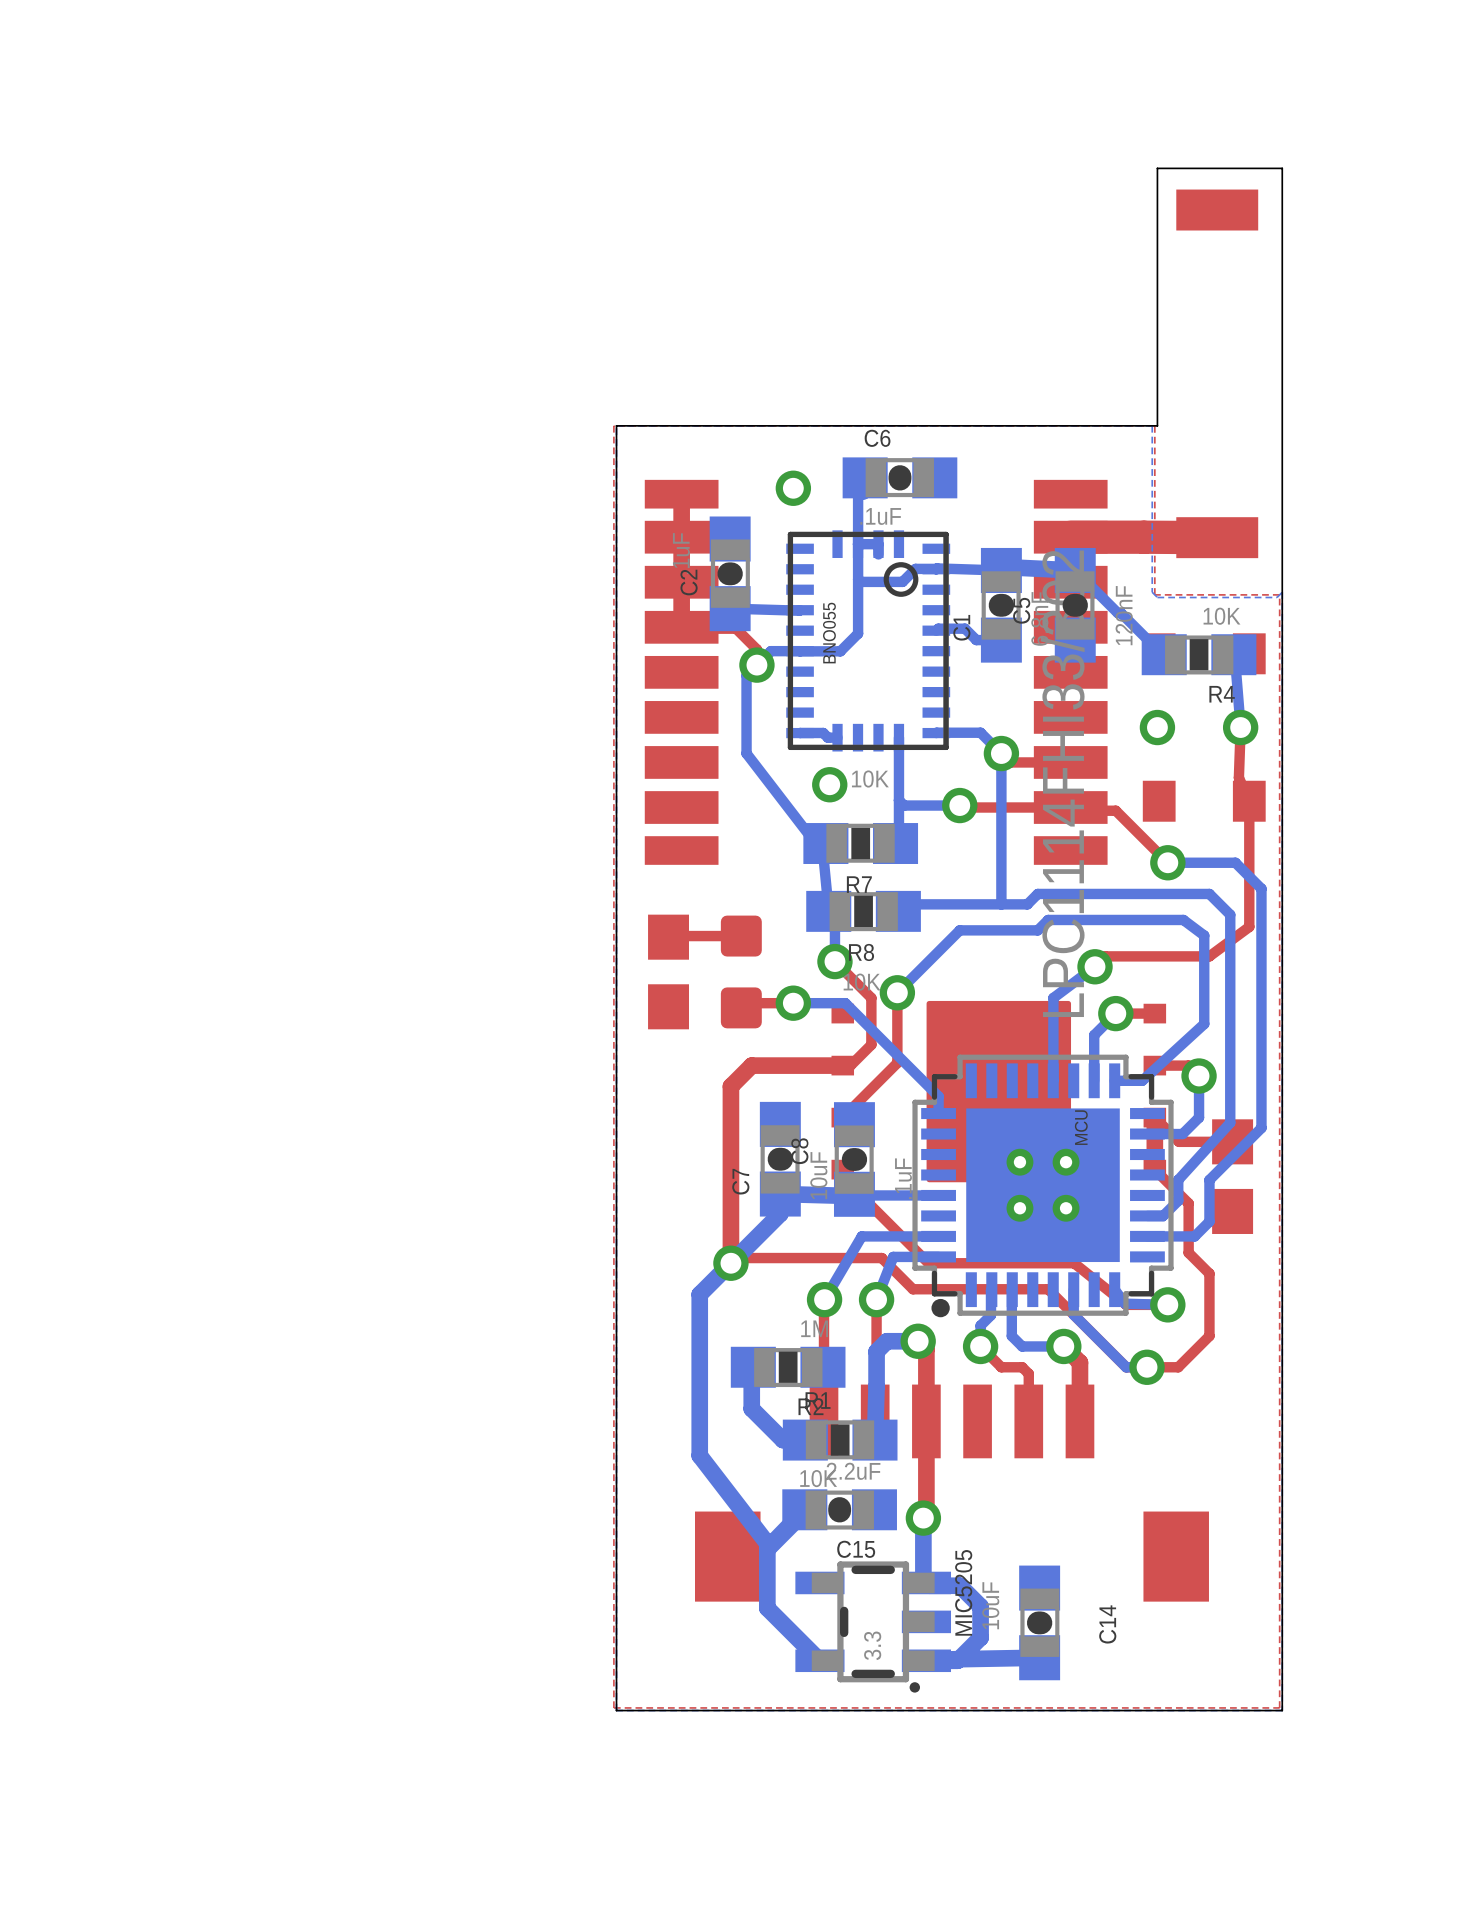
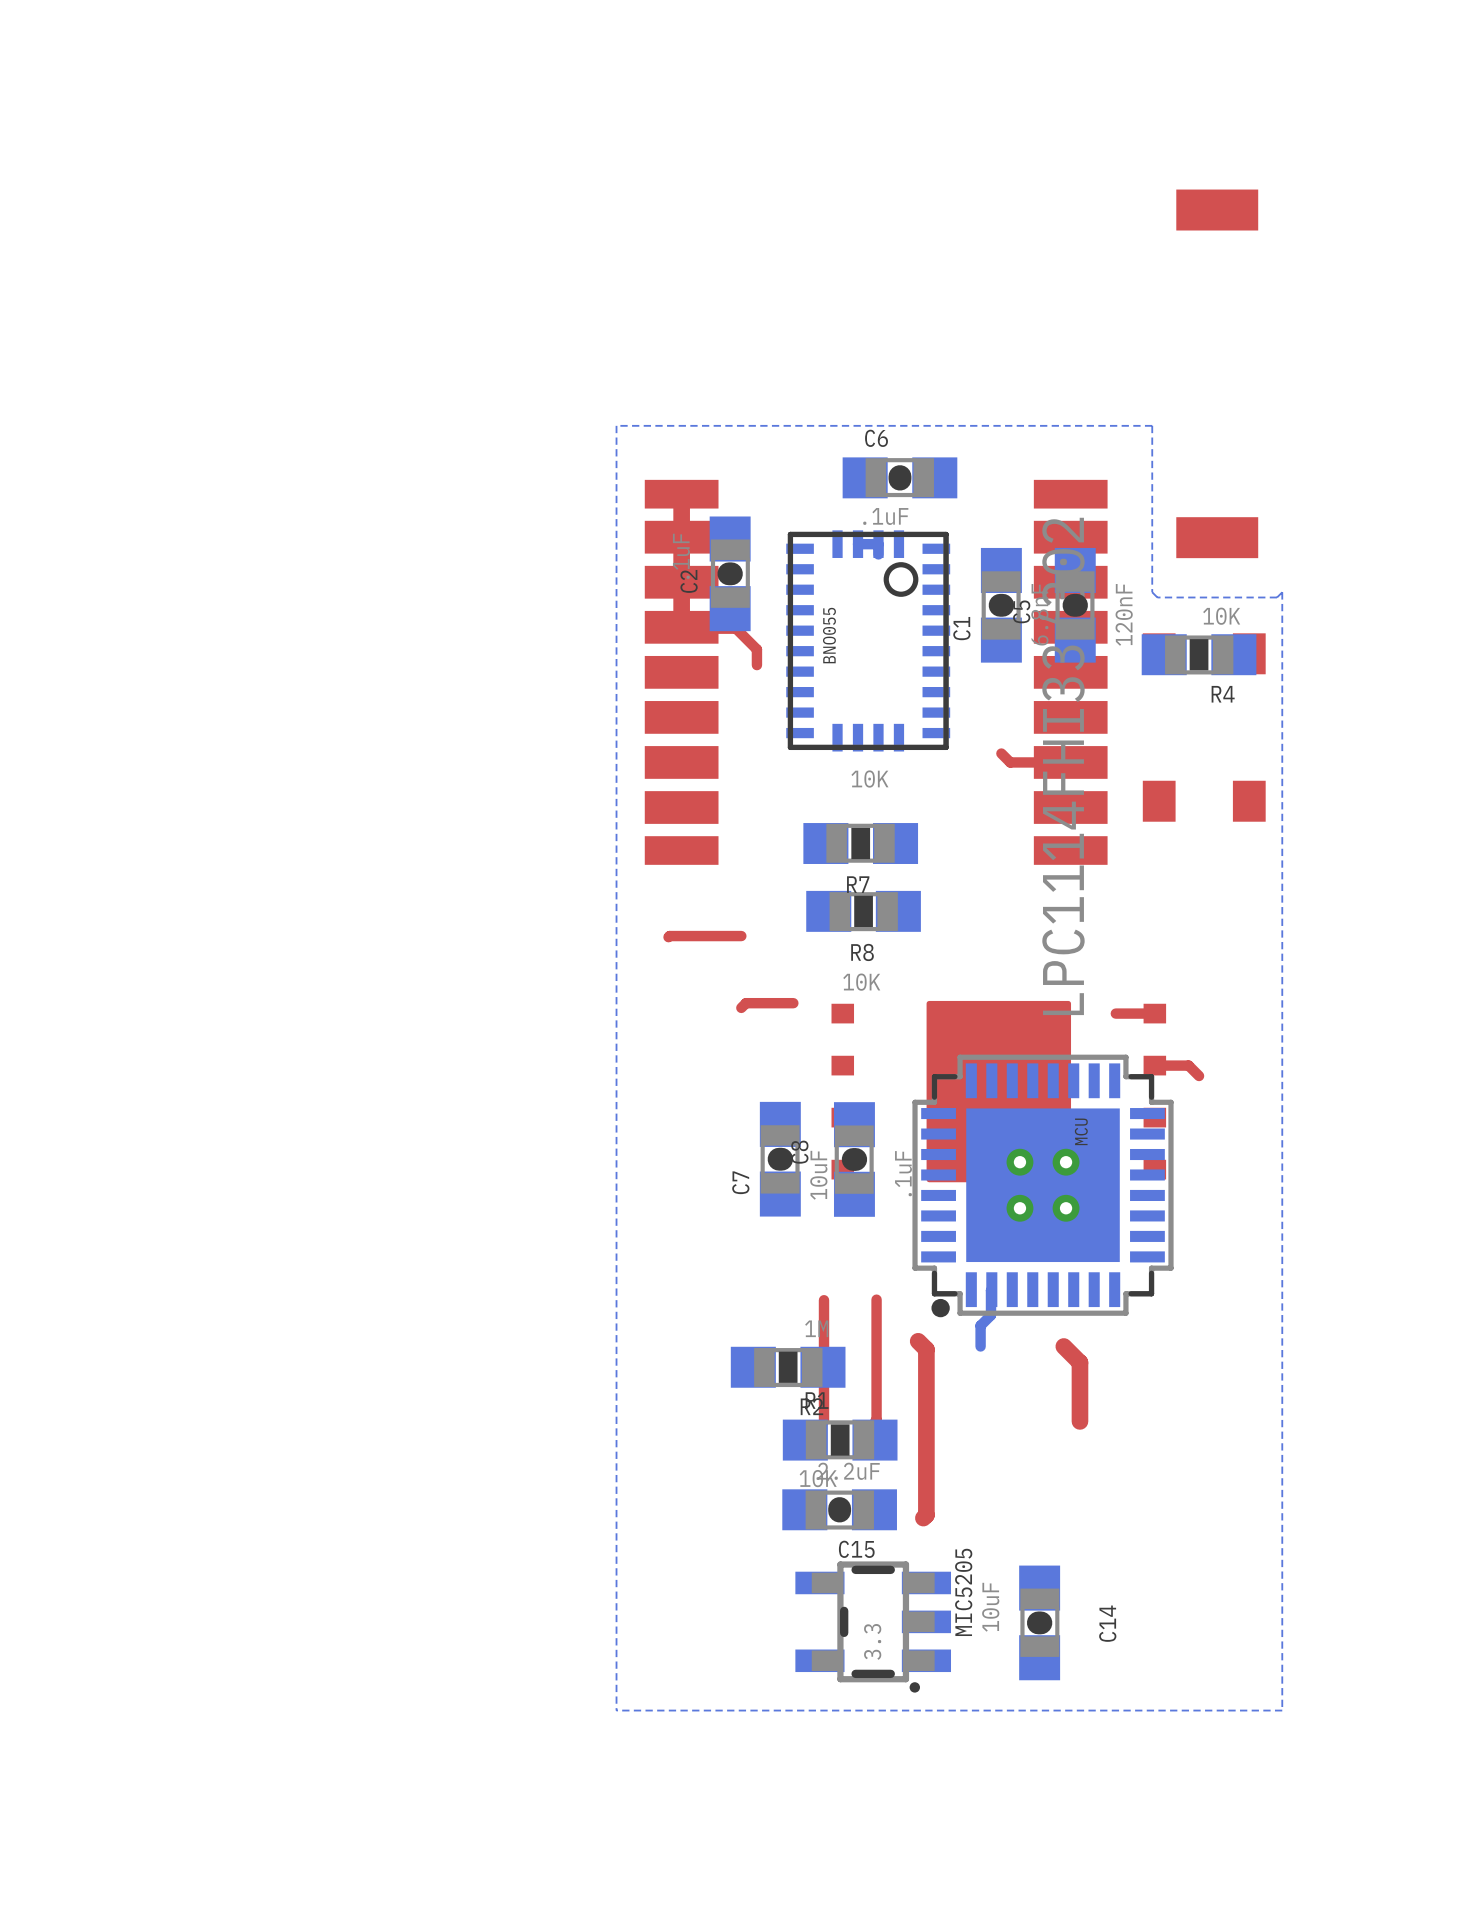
board edge: (1282, 168) (1282, 1710) (616, 1710) (616, 425) (1157, 425) (1157, 168) (1282, 168) -> none
top zone outline: (1154, 425) (1154, 594) (1279, 594) (1279, 1707) (613, 1707) (613, 425) (1154, 425) -> none
bottom track: (865, 477) (864, 494) (858, 494) (858, 633) (840, 651) (800, 651) -> none
via: (793, 488) -> none
top track: (1070, 537) (1217, 537) -> none
bottom track: (935, 568) (915, 568) (902, 581) (860, 581) (858, 579) -> none
bottom track: (936, 569) (1001, 570) (1010, 567) (1075, 570) (1117, 613) (1121, 613) (1164, 654) -> none
bottom track: (730, 608) (799, 610) -> none
bottom track: (936, 630) (938, 628) (964, 628) (976, 640) (1001, 640) -> none
bottom track: (800, 651) (770, 651) (746, 675) (746, 753) (815, 843) (825, 843) (822, 845) (828, 911) (834, 917) (834, 961) -> none
bottom track: (1233, 654) (1240, 727) -> none
via: (756, 665) -> none
via: (1157, 727) -> none
top track: (1240, 727) (1238, 777) (1249, 801) (1249, 926) (1209, 956) (1105, 956) (1095, 966) -> none
via: (1240, 727) -> none
bottom track: (800, 732) (823, 732) (827, 737) (837, 737) -> none
bottom track: (936, 732) (980, 732) (1001, 753) (1001, 904) -> none
bottom track: (898, 737) (898, 831) (895, 843) (897, 841) -> none
via: (1001, 753) -> none
via: (829, 784) -> none
bottom track: (898, 800) (904, 805) (959, 805) -> none
top track: (959, 805) (961, 807) (1070, 807) (1073, 810) (1115, 810) (1167, 862) -> none
via: (959, 805) -> none
bottom track: (1167, 862) (1235, 862) (1261, 888) (1261, 1128) (1209, 1180) (1209, 1221) (1194, 1236) (1147, 1236) -> none
via: (1167, 862) -> none
bottom track: (898, 911) (905, 904) (1027, 904) (1037, 893) (1209, 893) (1230, 914) (1230, 1122) (1178, 1180) (1178, 1200) (1163, 1215) (1147, 1215) -> none
top track: (834, 961) (871, 997) (871, 1044) (850, 1065) (751, 1065) (730, 1086) (730, 1263) (736, 1258) (881, 1258) (912, 1289) (1048, 1289) (1126, 1367) (1178, 1367) (1209, 1336) (1209, 1273) (1188, 1252) (1188, 1203) (1154, 1169) (1154, 1117) (1179, 1141) (1232, 1141) -> none
via: (834, 961) -> none
bottom track: (1095, 966) (1053, 997) (1053, 1080) -> none
via: (1095, 966) -> none
part: (668, 971) -> none
part: (741, 971) -> none
bottom track: (897, 992) (959, 930) (1037, 930) (1048, 919) (1183, 919) (1204, 935) (1204, 1023) (1142, 1080) (1114, 1080) -> none
top track: (897, 992) (897, 1063) (842, 1117) -> none
via: (897, 992) -> none
bottom track: (793, 1003) (845, 1003) (938, 1096) (938, 1113) -> none
via: (793, 1003) -> none
bottom track: (1115, 1013) (1094, 1035) (1094, 1080) -> none
via: (1115, 1013) -> none
bottom track: (1199, 1076) (1199, 1117) (1182, 1134) (1147, 1134) -> none
via: (1199, 1076) -> none
top track: (842, 1169) (842, 1177) (928, 1263) (1074, 1263) (1126, 1304) (1167, 1304) -> none
part: (1232, 1176) -> none
bottom track: (938, 1195) (780, 1194) (780, 1213) (699, 1294) (699, 1455) (769, 1546) (804, 1509) (767, 1549) (767, 1608) (819, 1660) -> none
bottom track: (938, 1236) (861, 1236) (824, 1299) -> none
bottom track: (938, 1256) (893, 1256) (876, 1299) -> none
via: (730, 1263) -> none
bottom track: (1073, 1289) (1073, 1314) (1126, 1367) (1147, 1367) -> none
bottom track: (1114, 1289) (1125, 1303) (1167, 1304) -> none
bottom track: (1011, 1290) (1011, 1336) (1022, 1346) (1063, 1346) -> none
via: (824, 1299) -> none
via: (876, 1299) -> none
via: (1167, 1304) -> none
bottom track: (918, 1341) (886, 1341) (876, 1351) (874, 1440) -> none
via: (918, 1341) -> none
top track: (980, 1346) (1001, 1367) (1022, 1367) (1028, 1373) (1028, 1421) -> none
via: (980, 1346) -> none
via: (1063, 1346) -> none
bottom track: (753, 1367) (751, 1408) (782, 1440) (805, 1440) -> none
via: (1147, 1367) -> none
part: (951, 1493) -> none
bottom track: (923, 1518) (923, 1579) (929, 1585) (959, 1585) (980, 1606) (980, 1637) (957, 1660) (926, 1660) (927, 1659) (1039, 1657) -> none
via: (923, 1518) -> none

